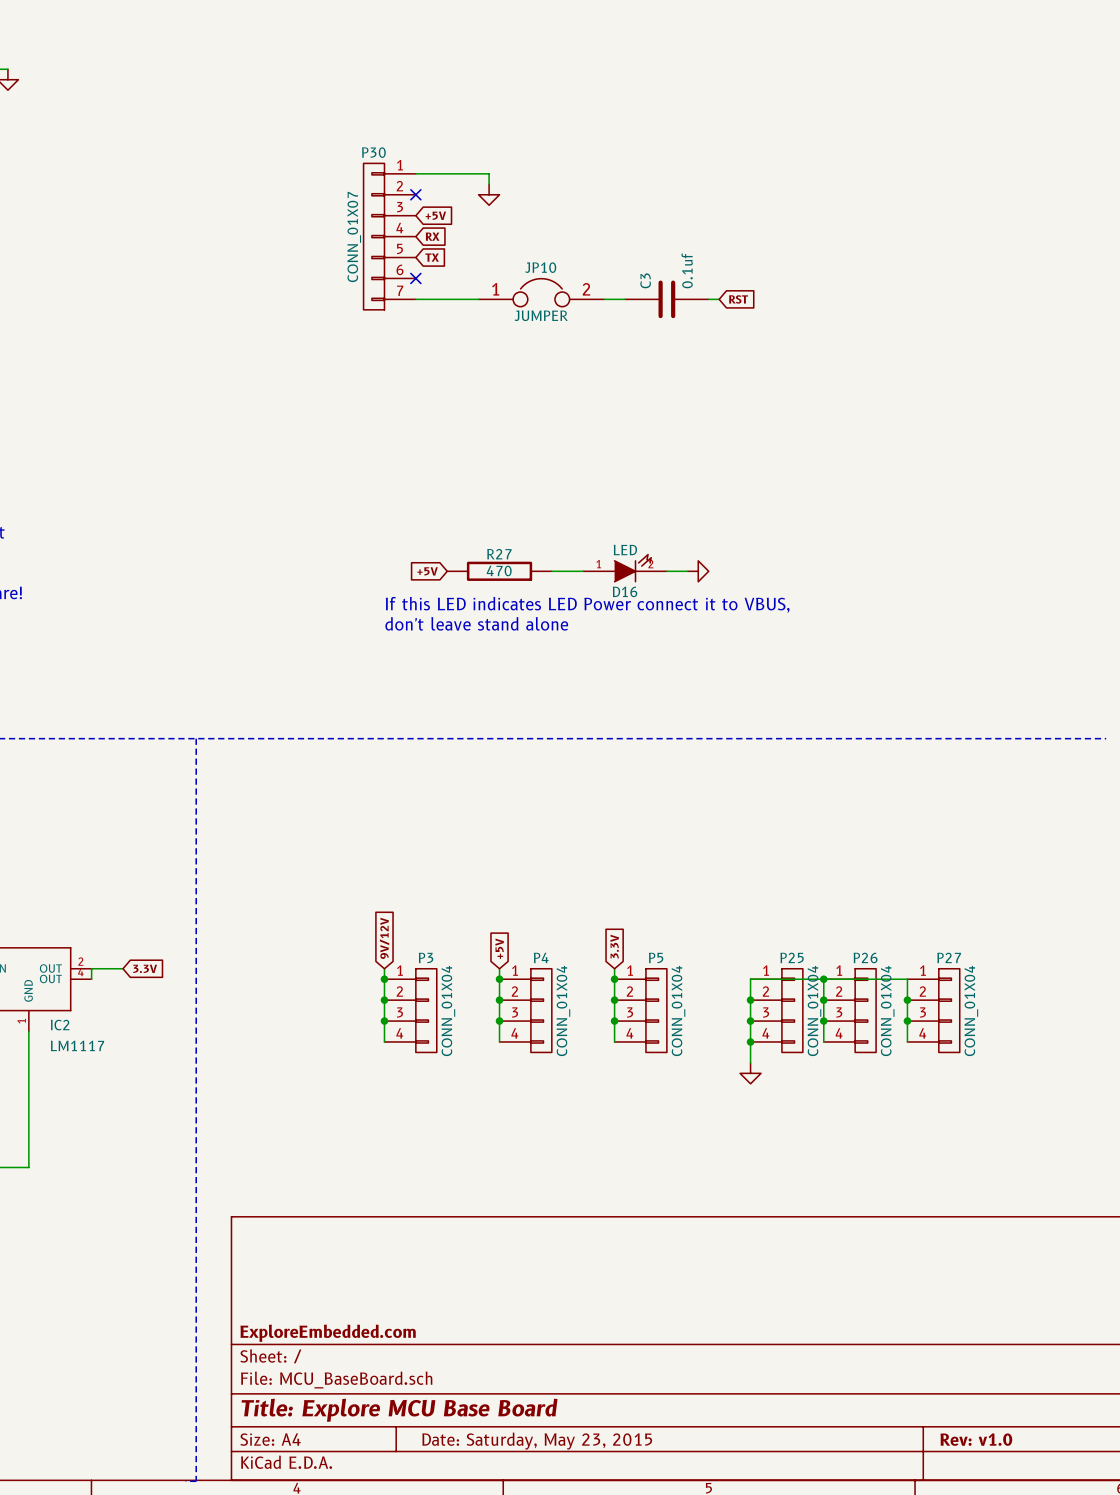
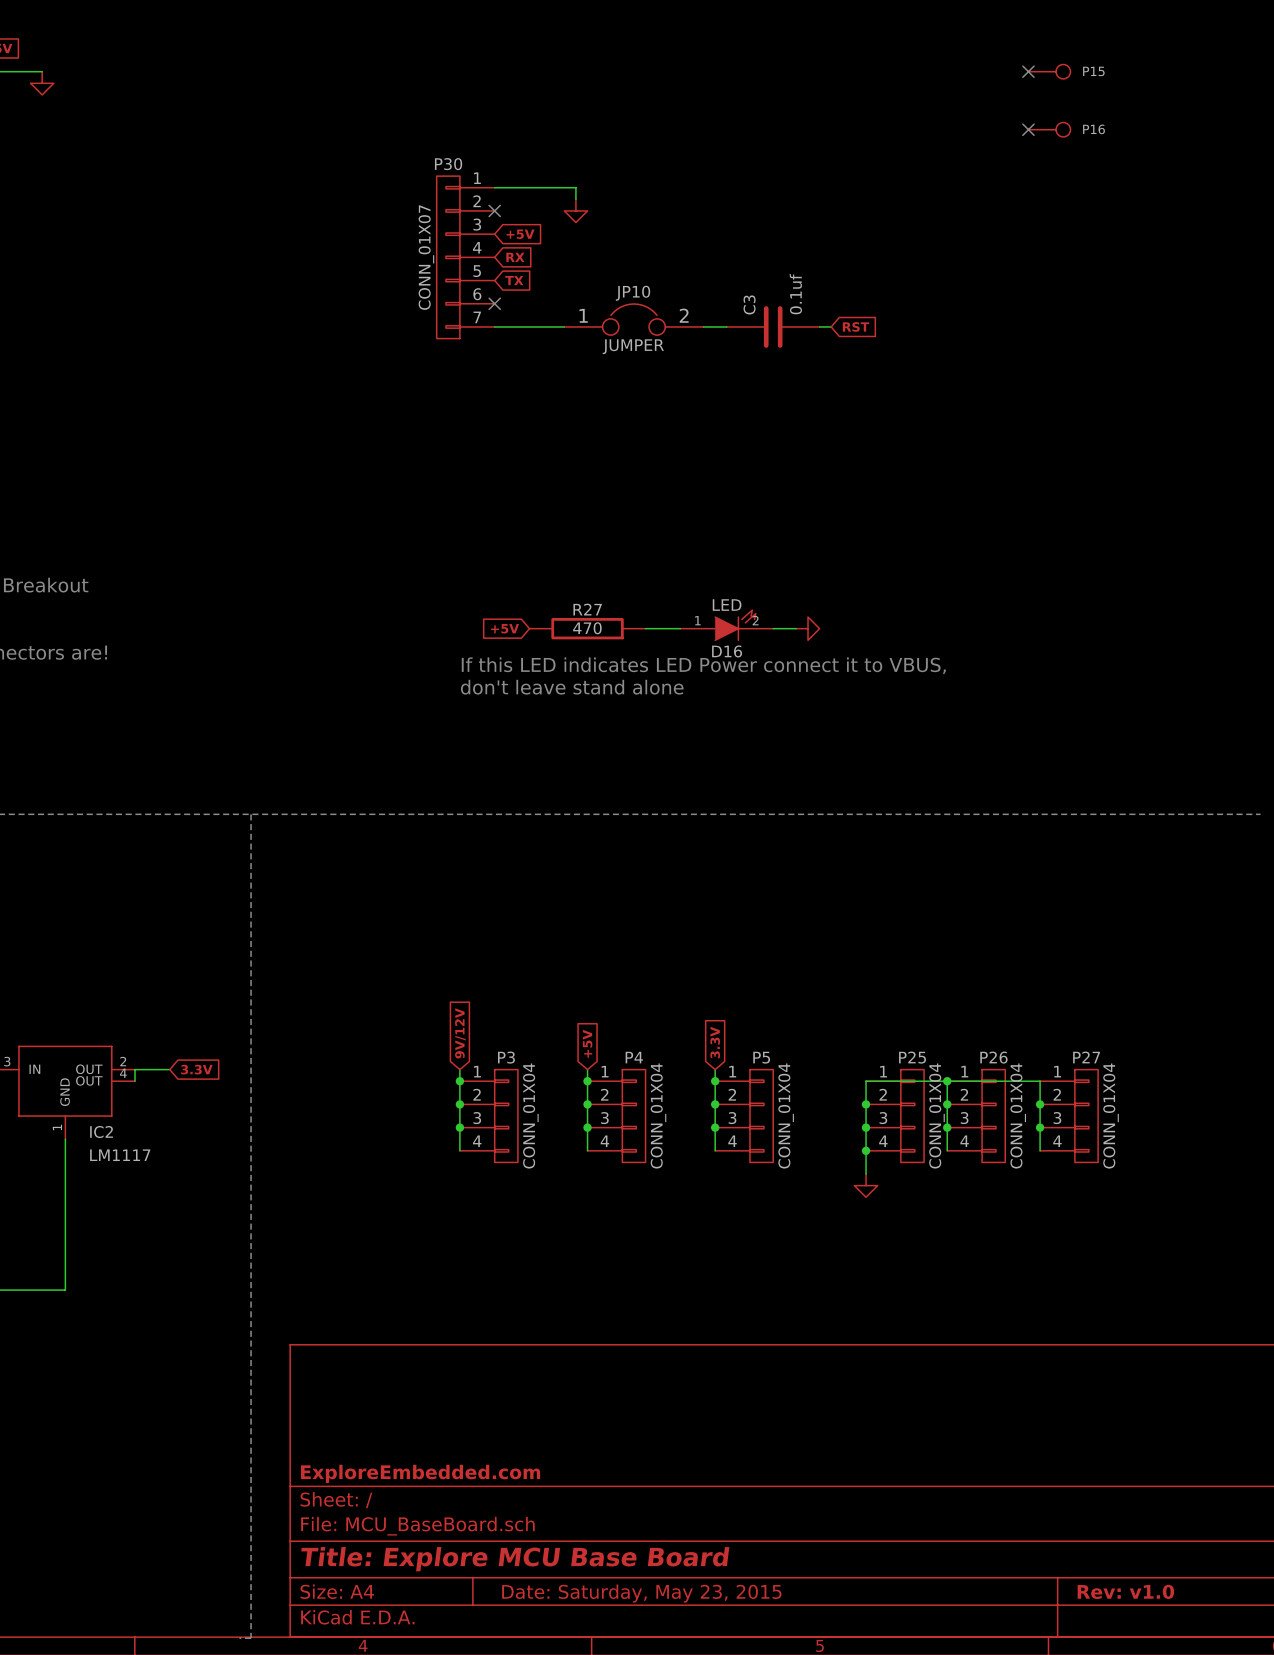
no-connect mark: none -> (1028, 71)
P15: none -> (1049, 71)
no-connect mark: none -> (1028, 129)
P16: none -> (1049, 129)

